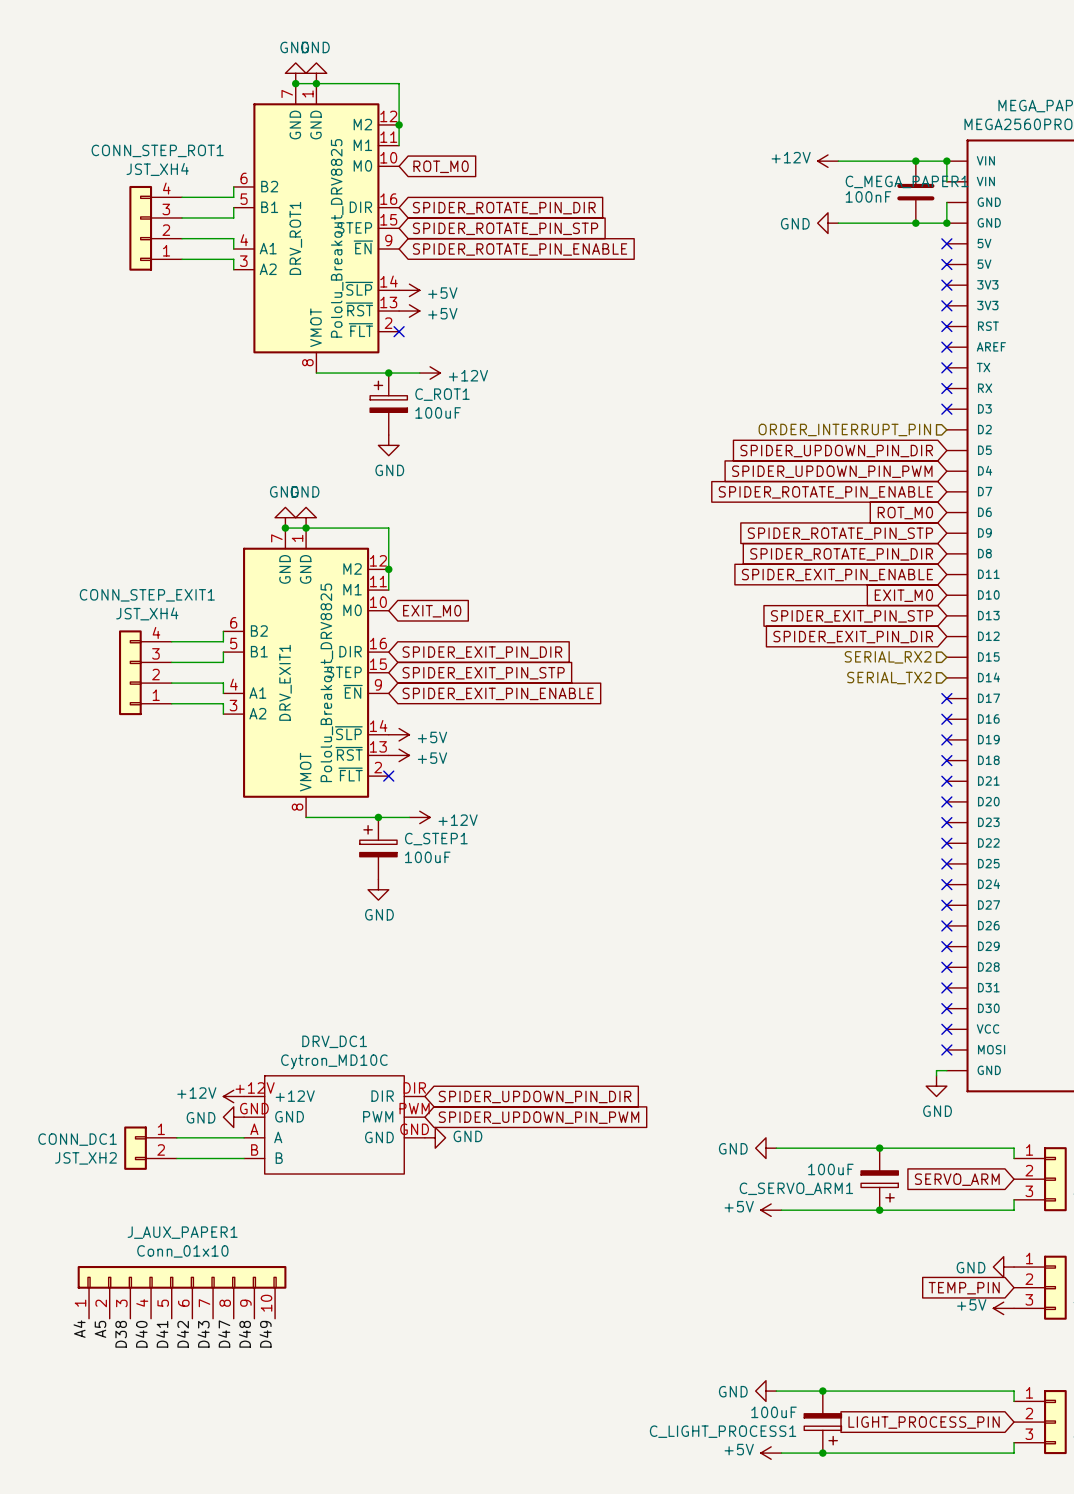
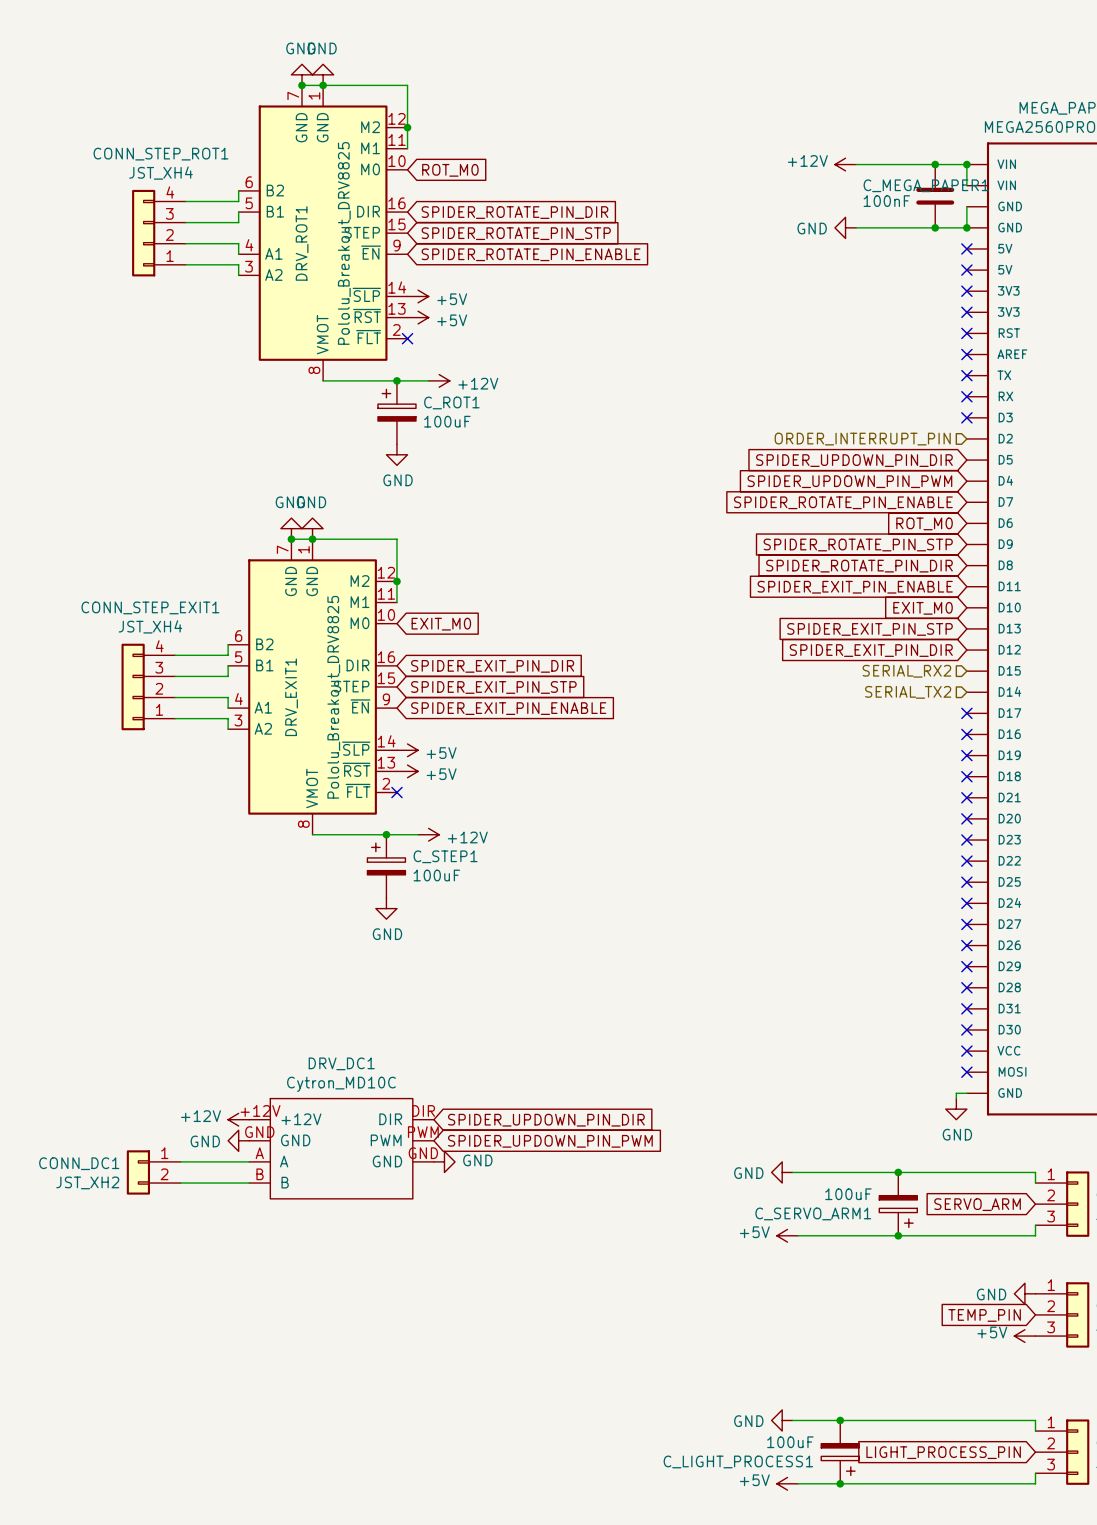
J_AUX_PAPER1: Conn_01x10 (182, 1292) -> none
label: A4 (79, 1329) -> none
label: A5 (100, 1329) -> none
label: D38 (121, 1334) -> none
label: D40 (141, 1334) -> none
label: D41 (162, 1334) -> none
label: D42 (182, 1334) -> none
label: D43 (203, 1334) -> none
label: D47 (224, 1334) -> none
label: D48 (244, 1334) -> none
label: D49 (265, 1334) -> none

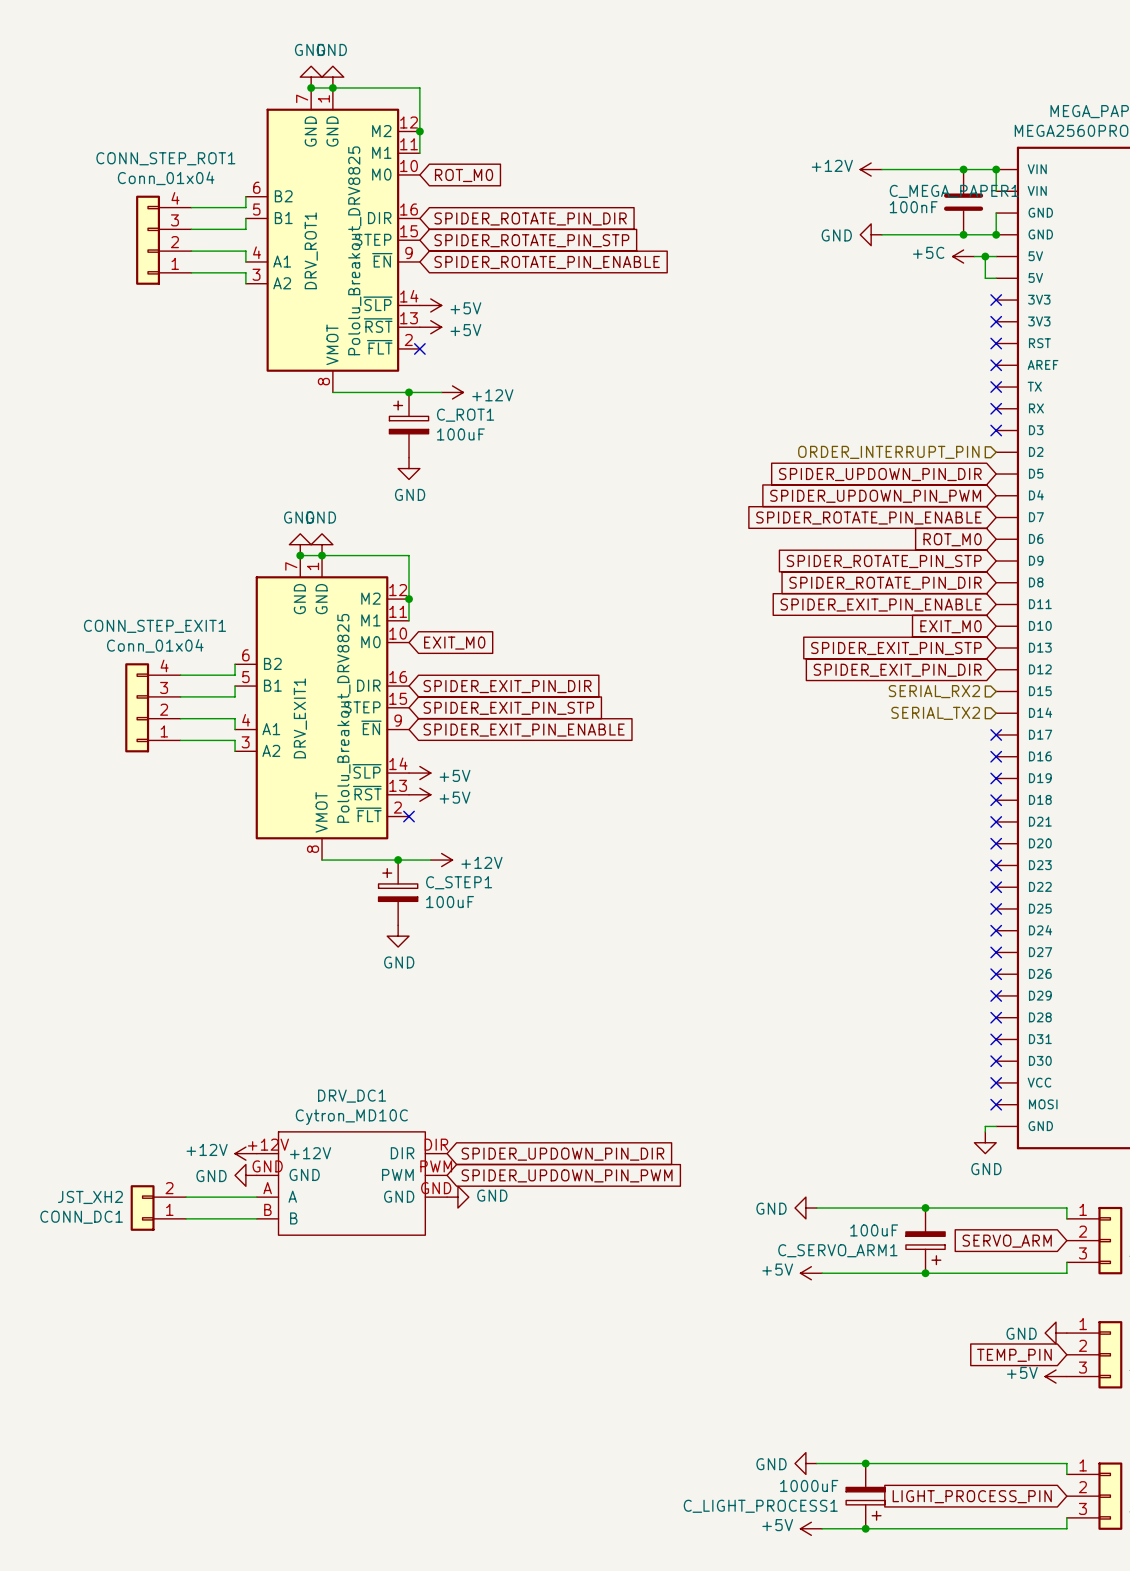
CONN_STEP_ROT1 value: JST_XH4 (160, 173) -> Conn_01x04 (166, 178)
power symbol: none -> +5C (963, 256)
wire: none -> (974, 256) (996, 256)
wire: none -> (985, 256) (985, 278) (996, 278)
junction: none -> (985, 256)
no-connect mark: (966, 248) -> none
no-connect mark: (966, 270) -> none
CONN_STEP_EXIT1 value: JST_XH4 (150, 626) -> Conn_01x04 (155, 645)
CONN_DC1 flip: as is (138, 1172) -> up-down (142, 1208)
C_LIGHT_PROCESS1 value: 100uF (790, 1442) -> 1000uF (809, 1485)

